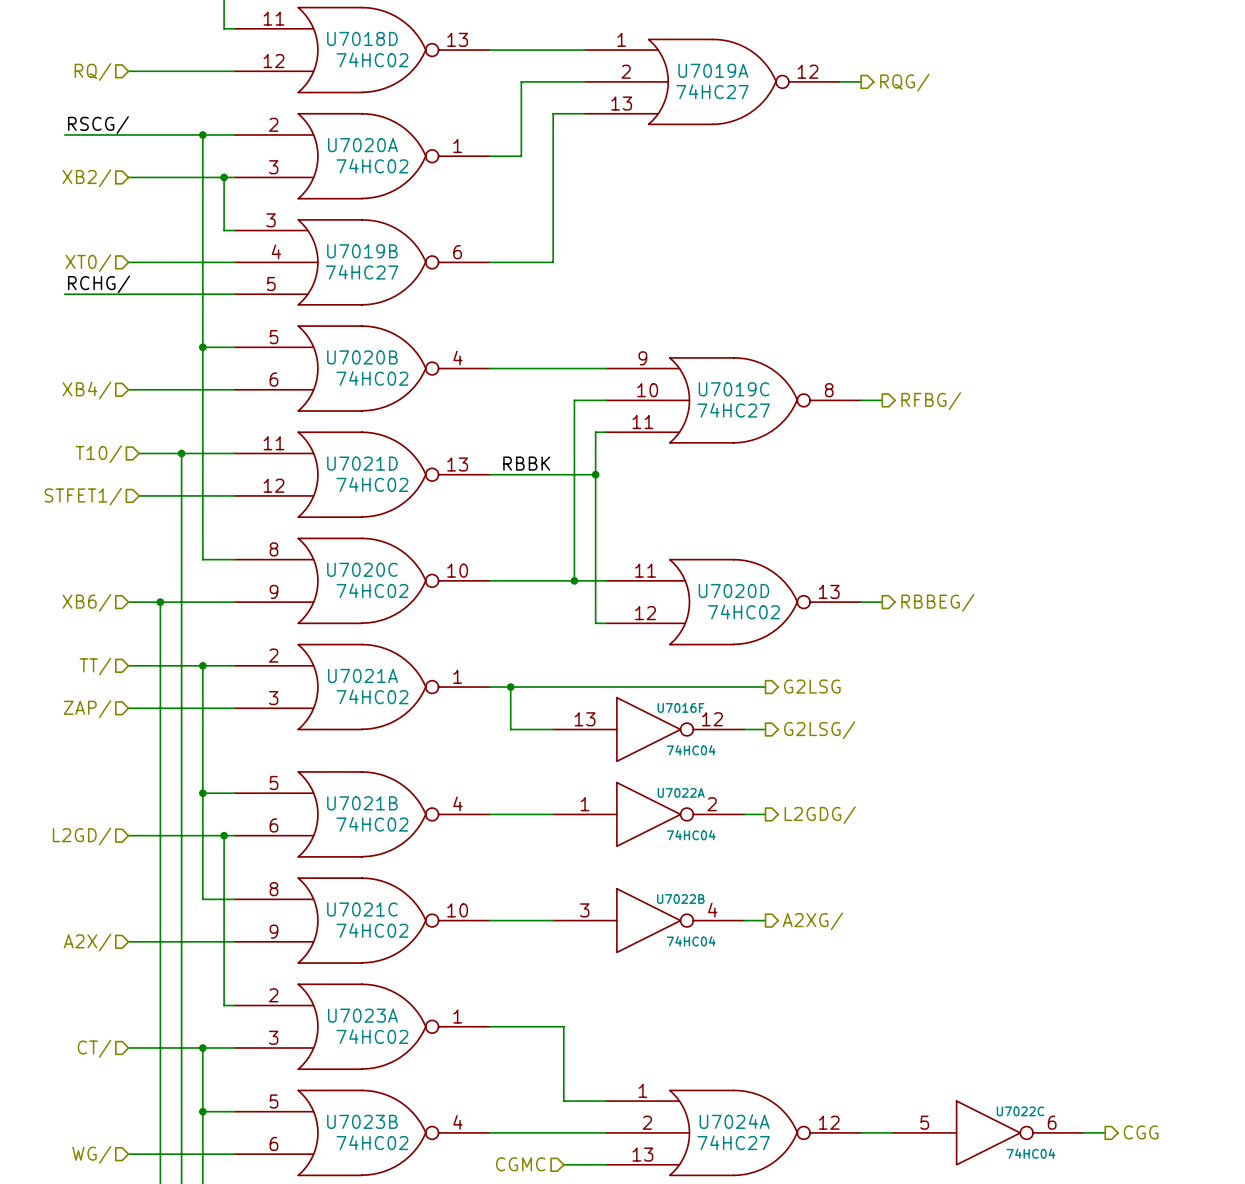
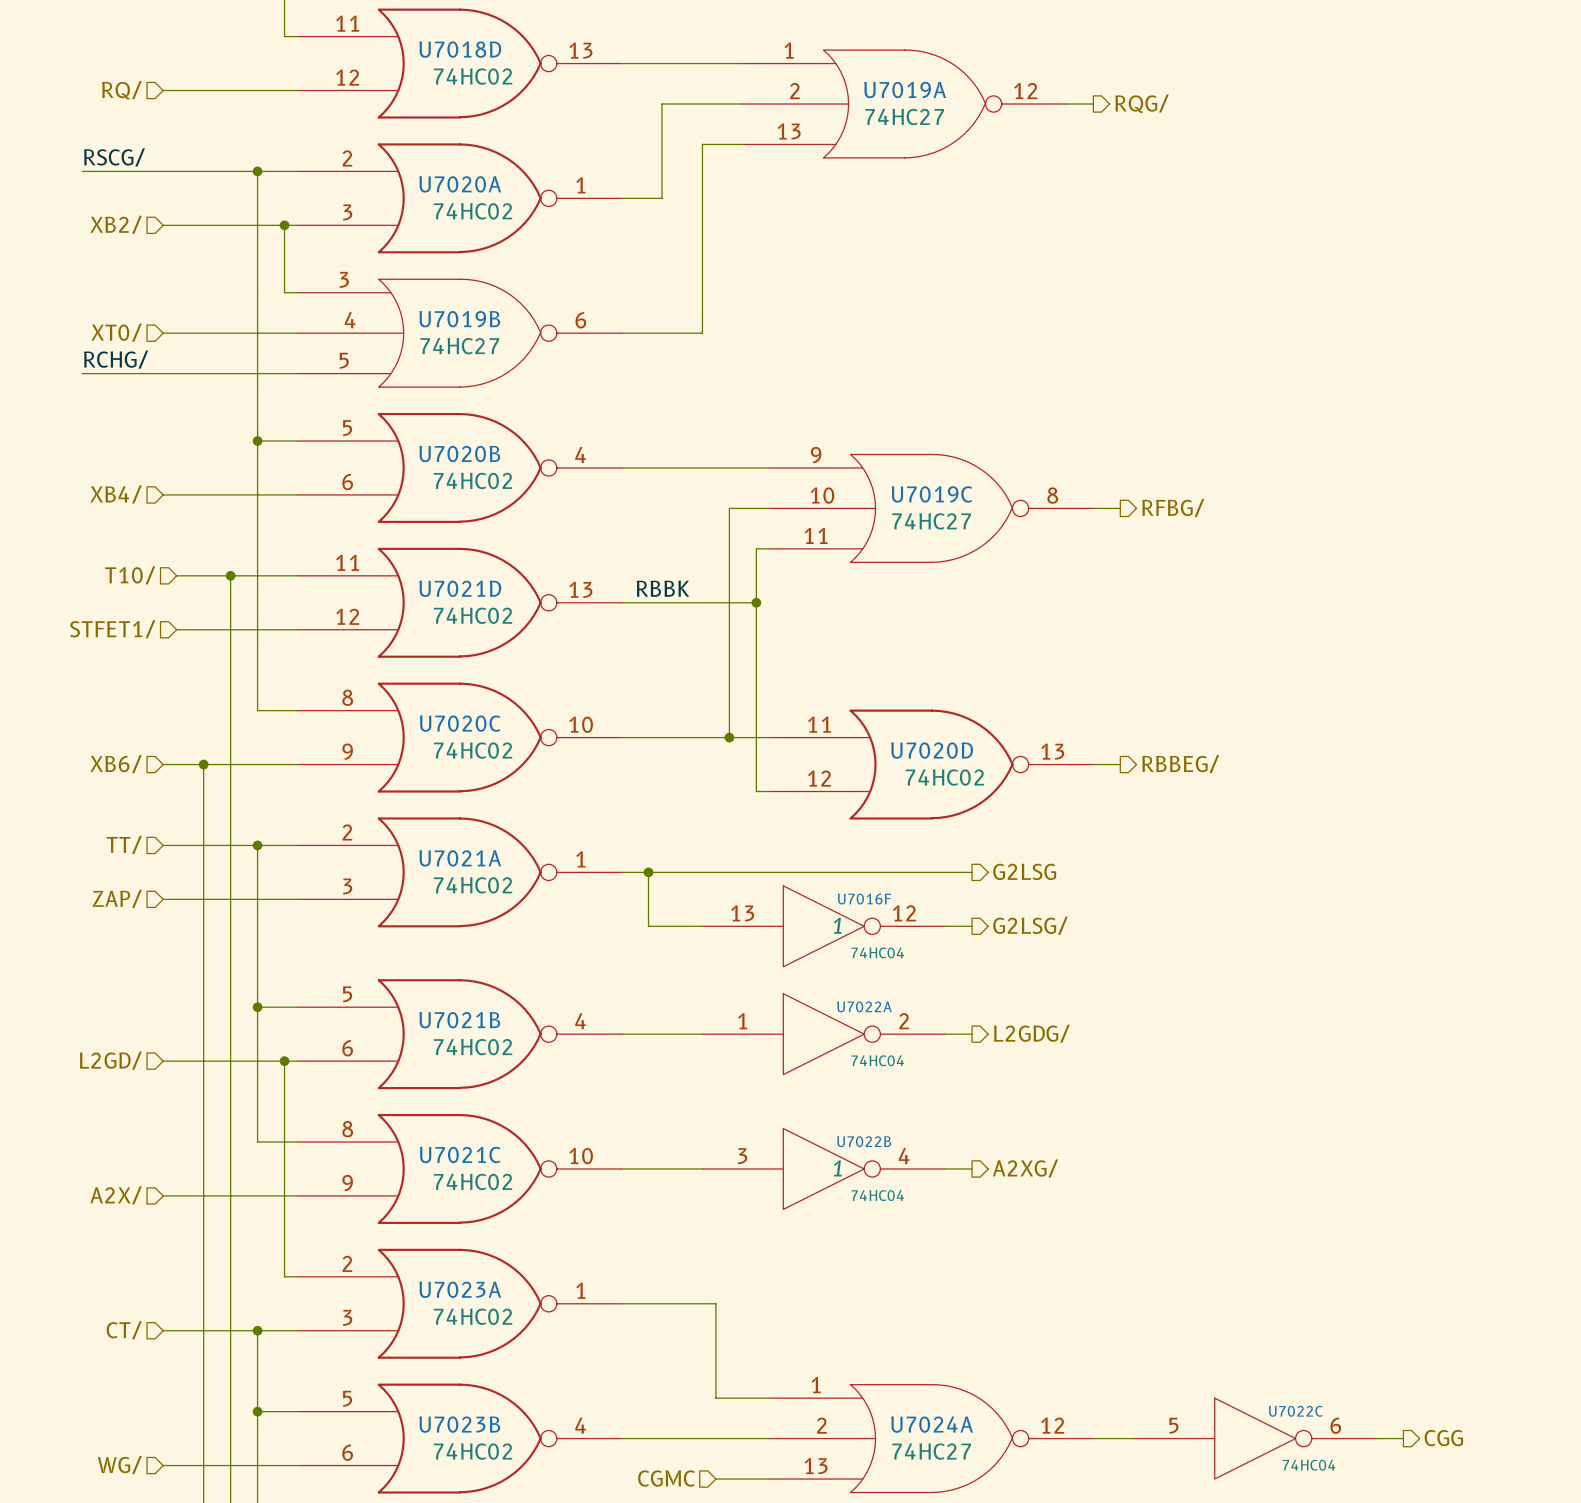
U7016F text: none -> 1 (837, 925)
U7022B text: none -> 1 (837, 1168)

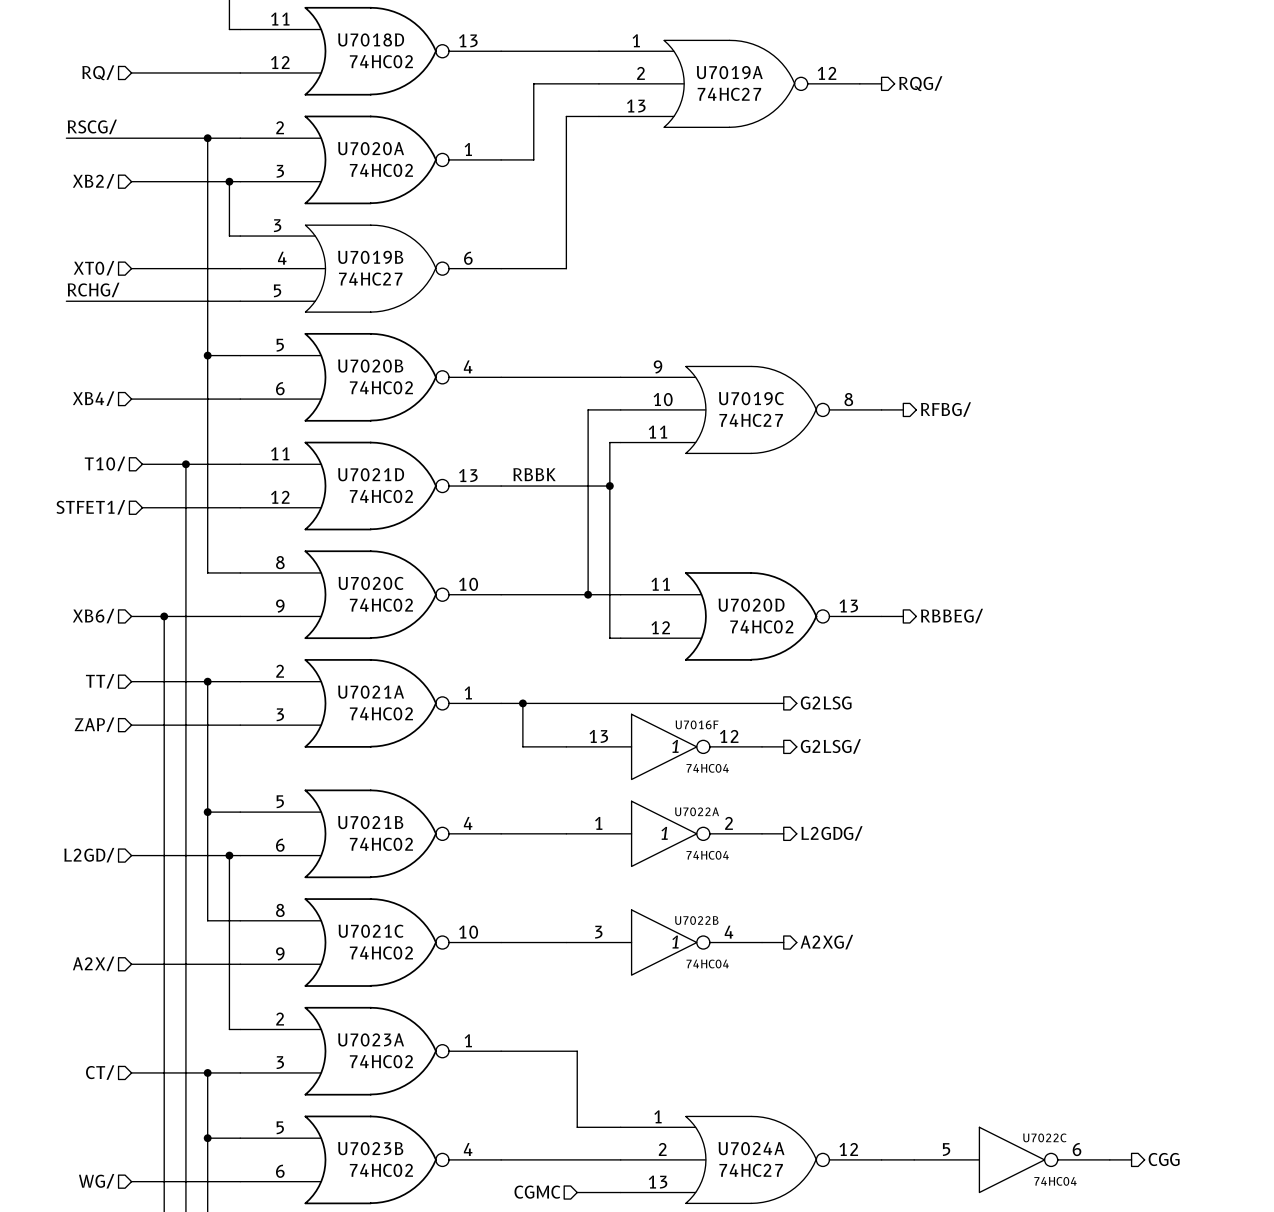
U7022A text: none -> 1 (664, 833)

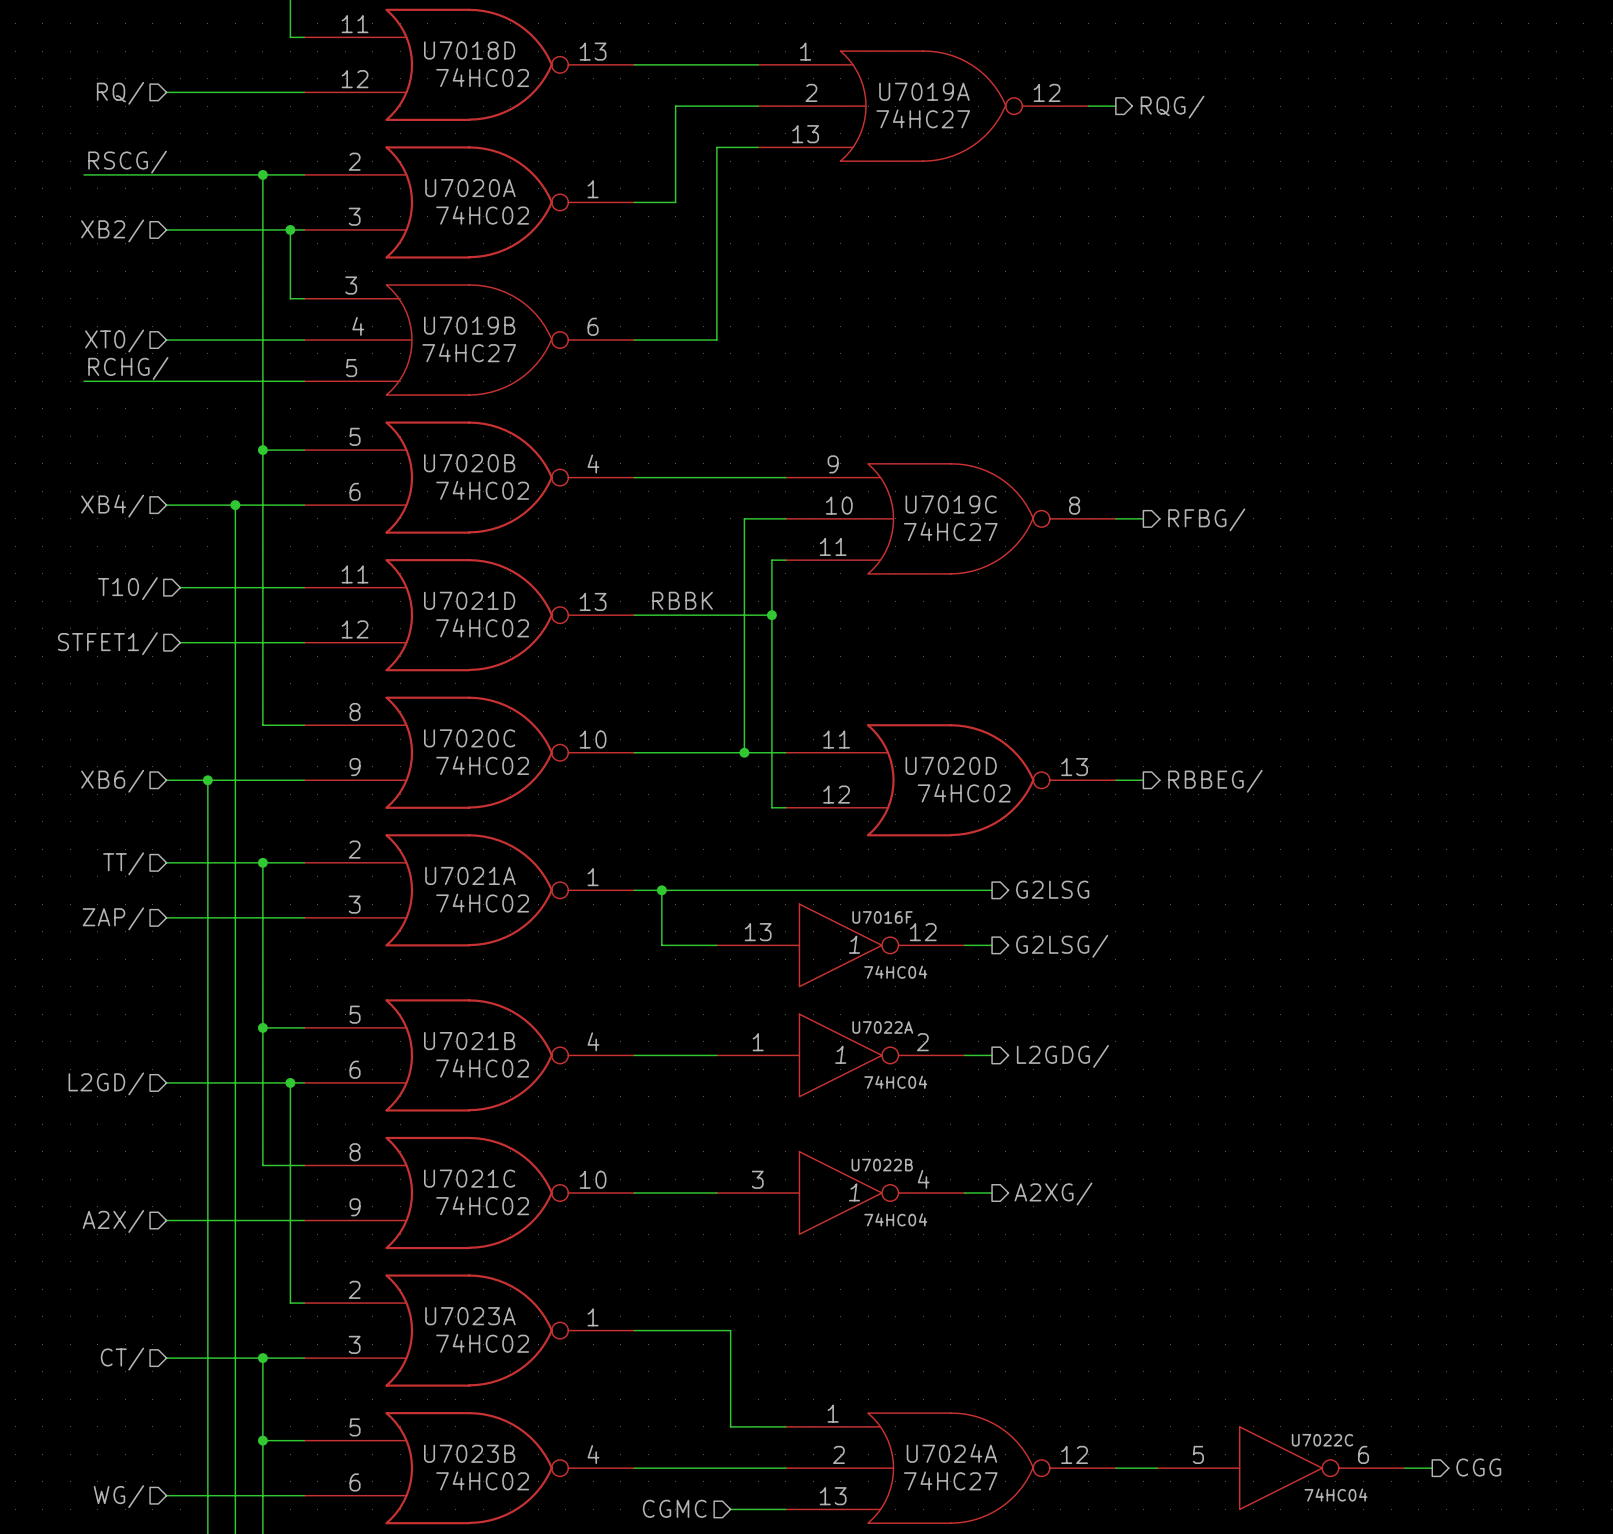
wire: none -> (235, 505) (235, 587)
junction: none -> (235, 505)
junction: (185, 464) -> none

